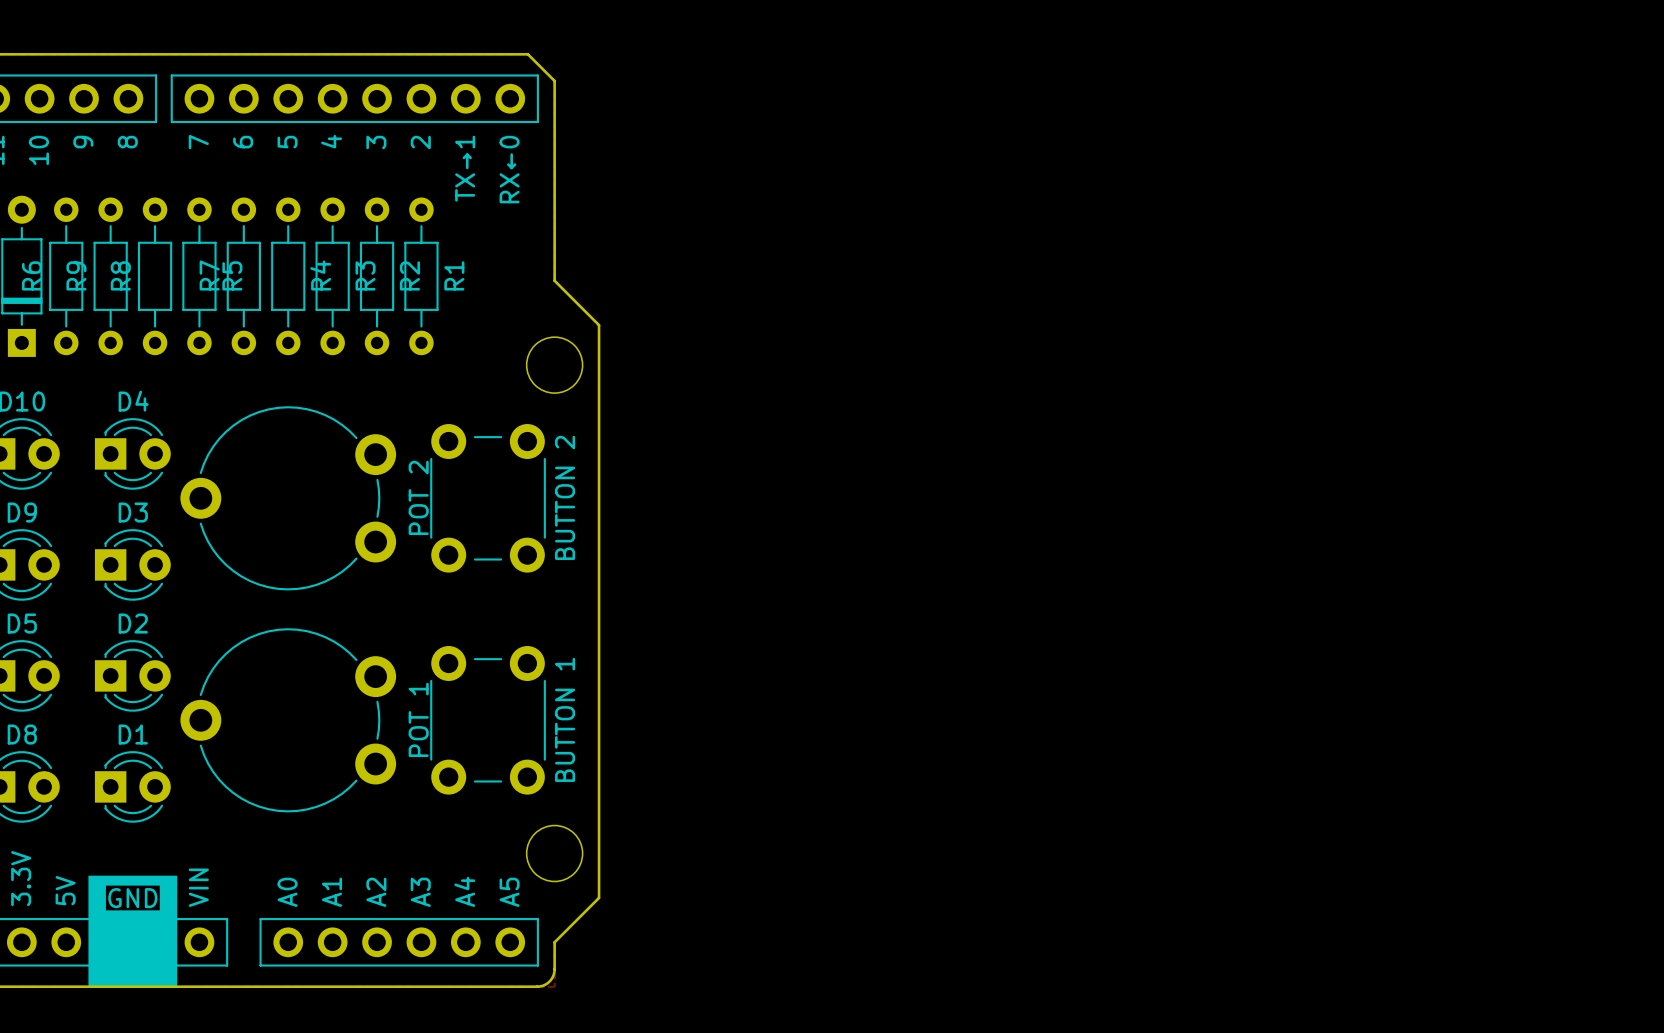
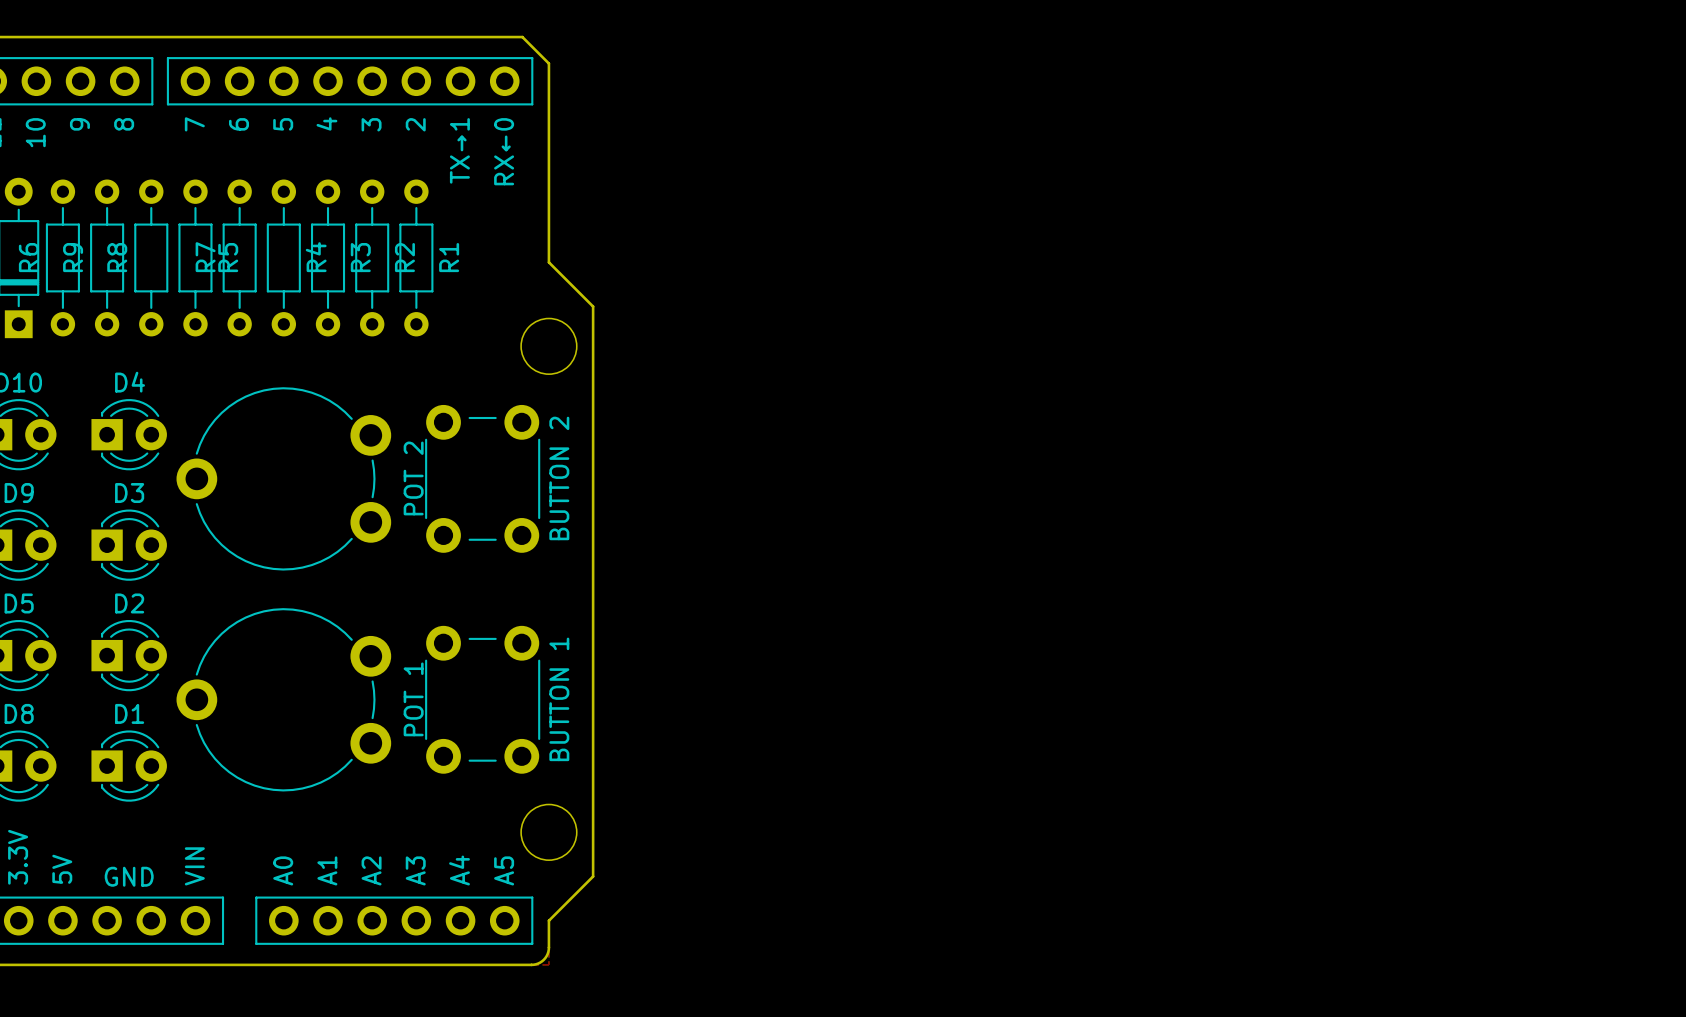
drawing: [88, 875, 178, 987] -> none

